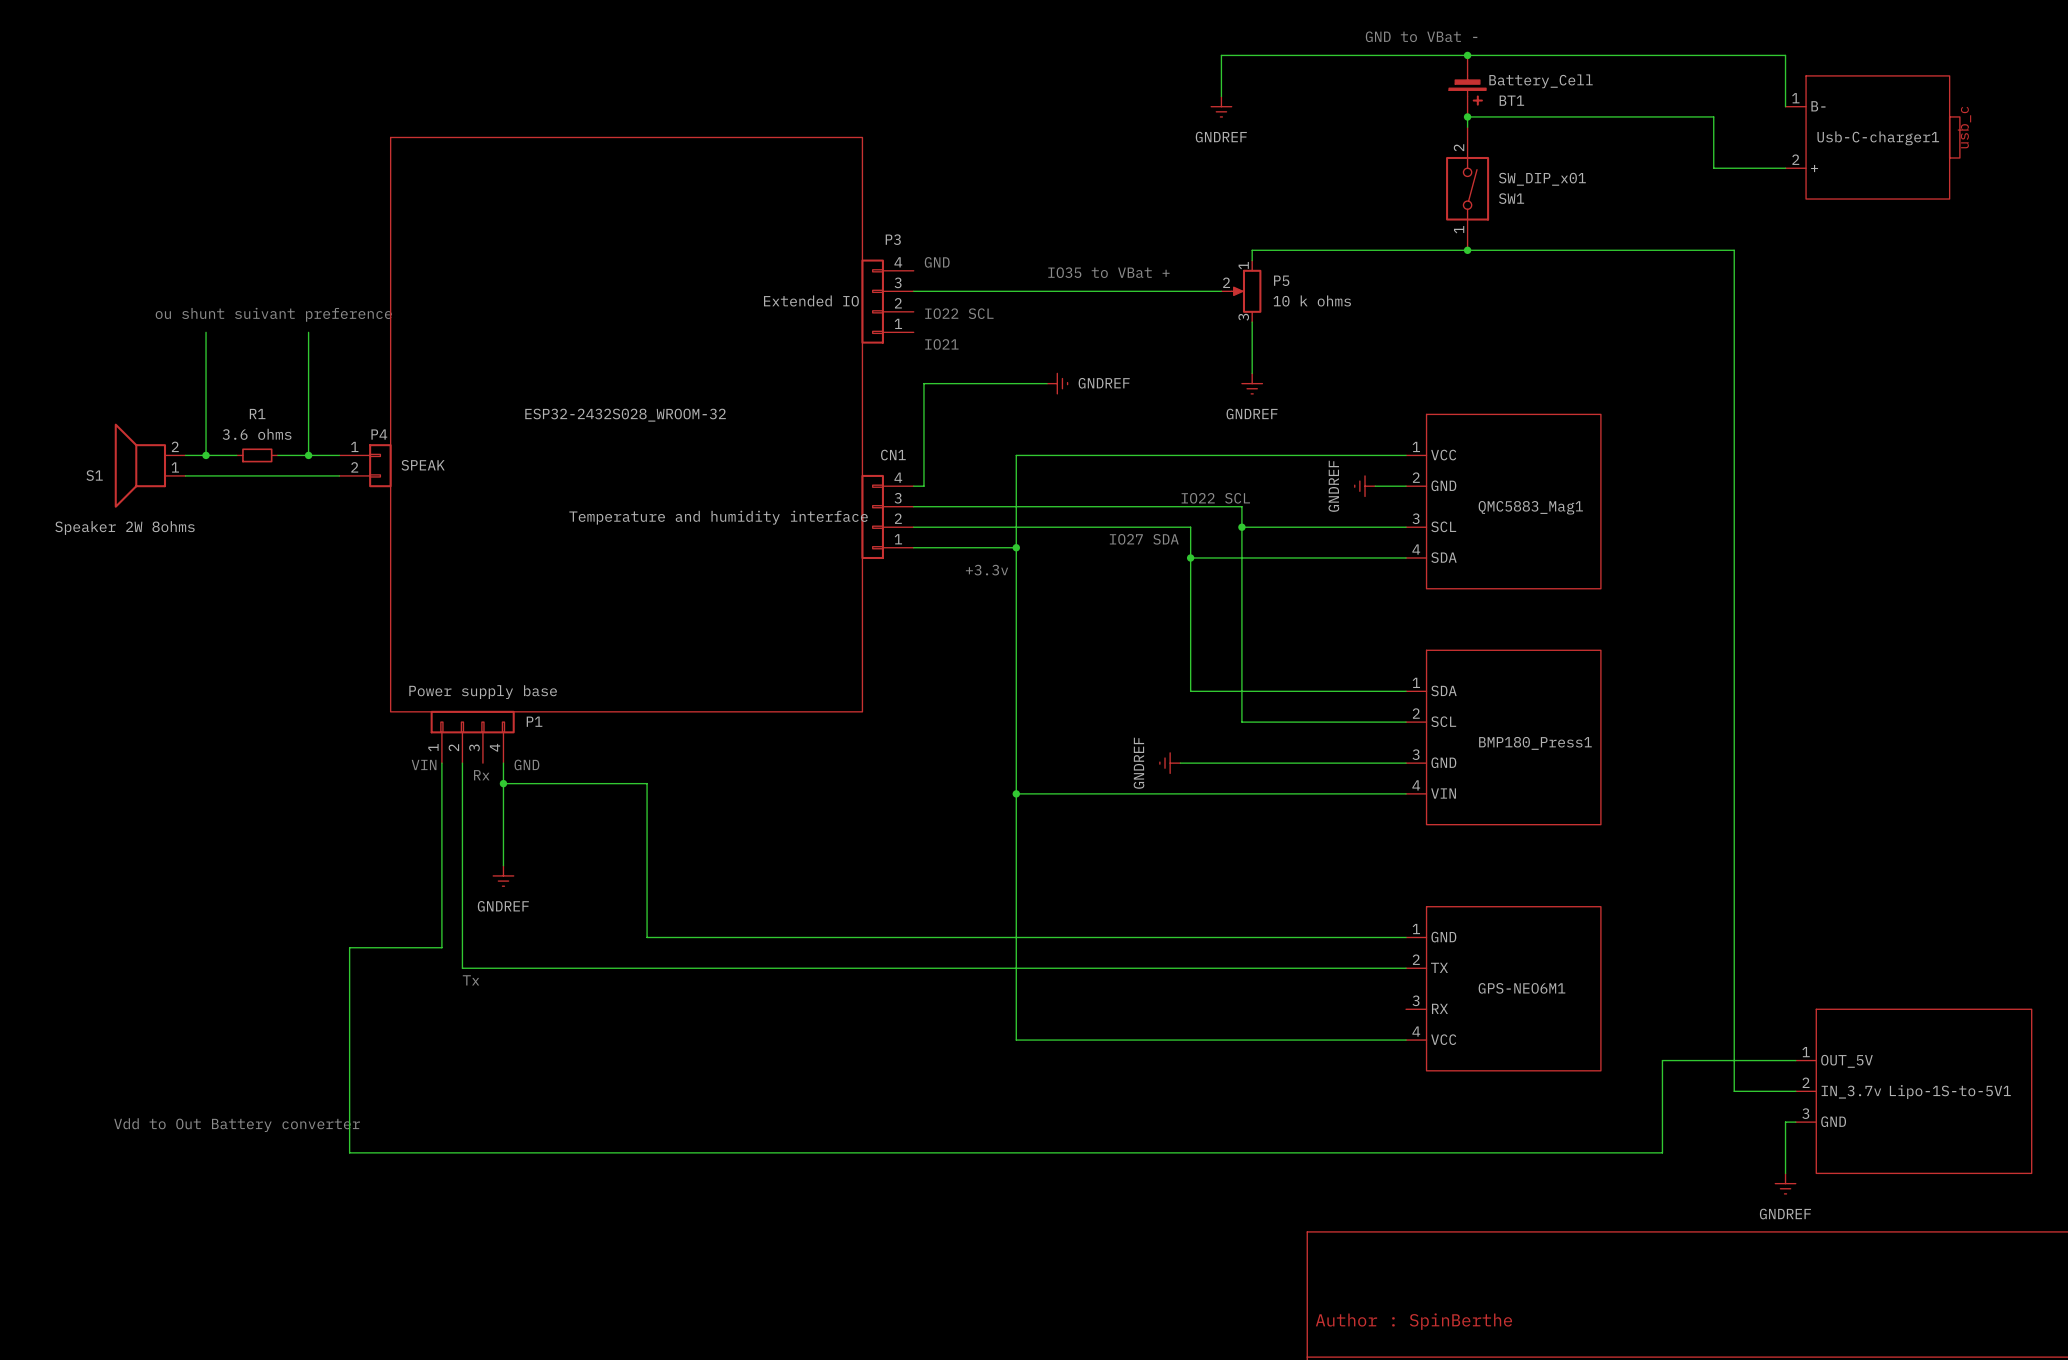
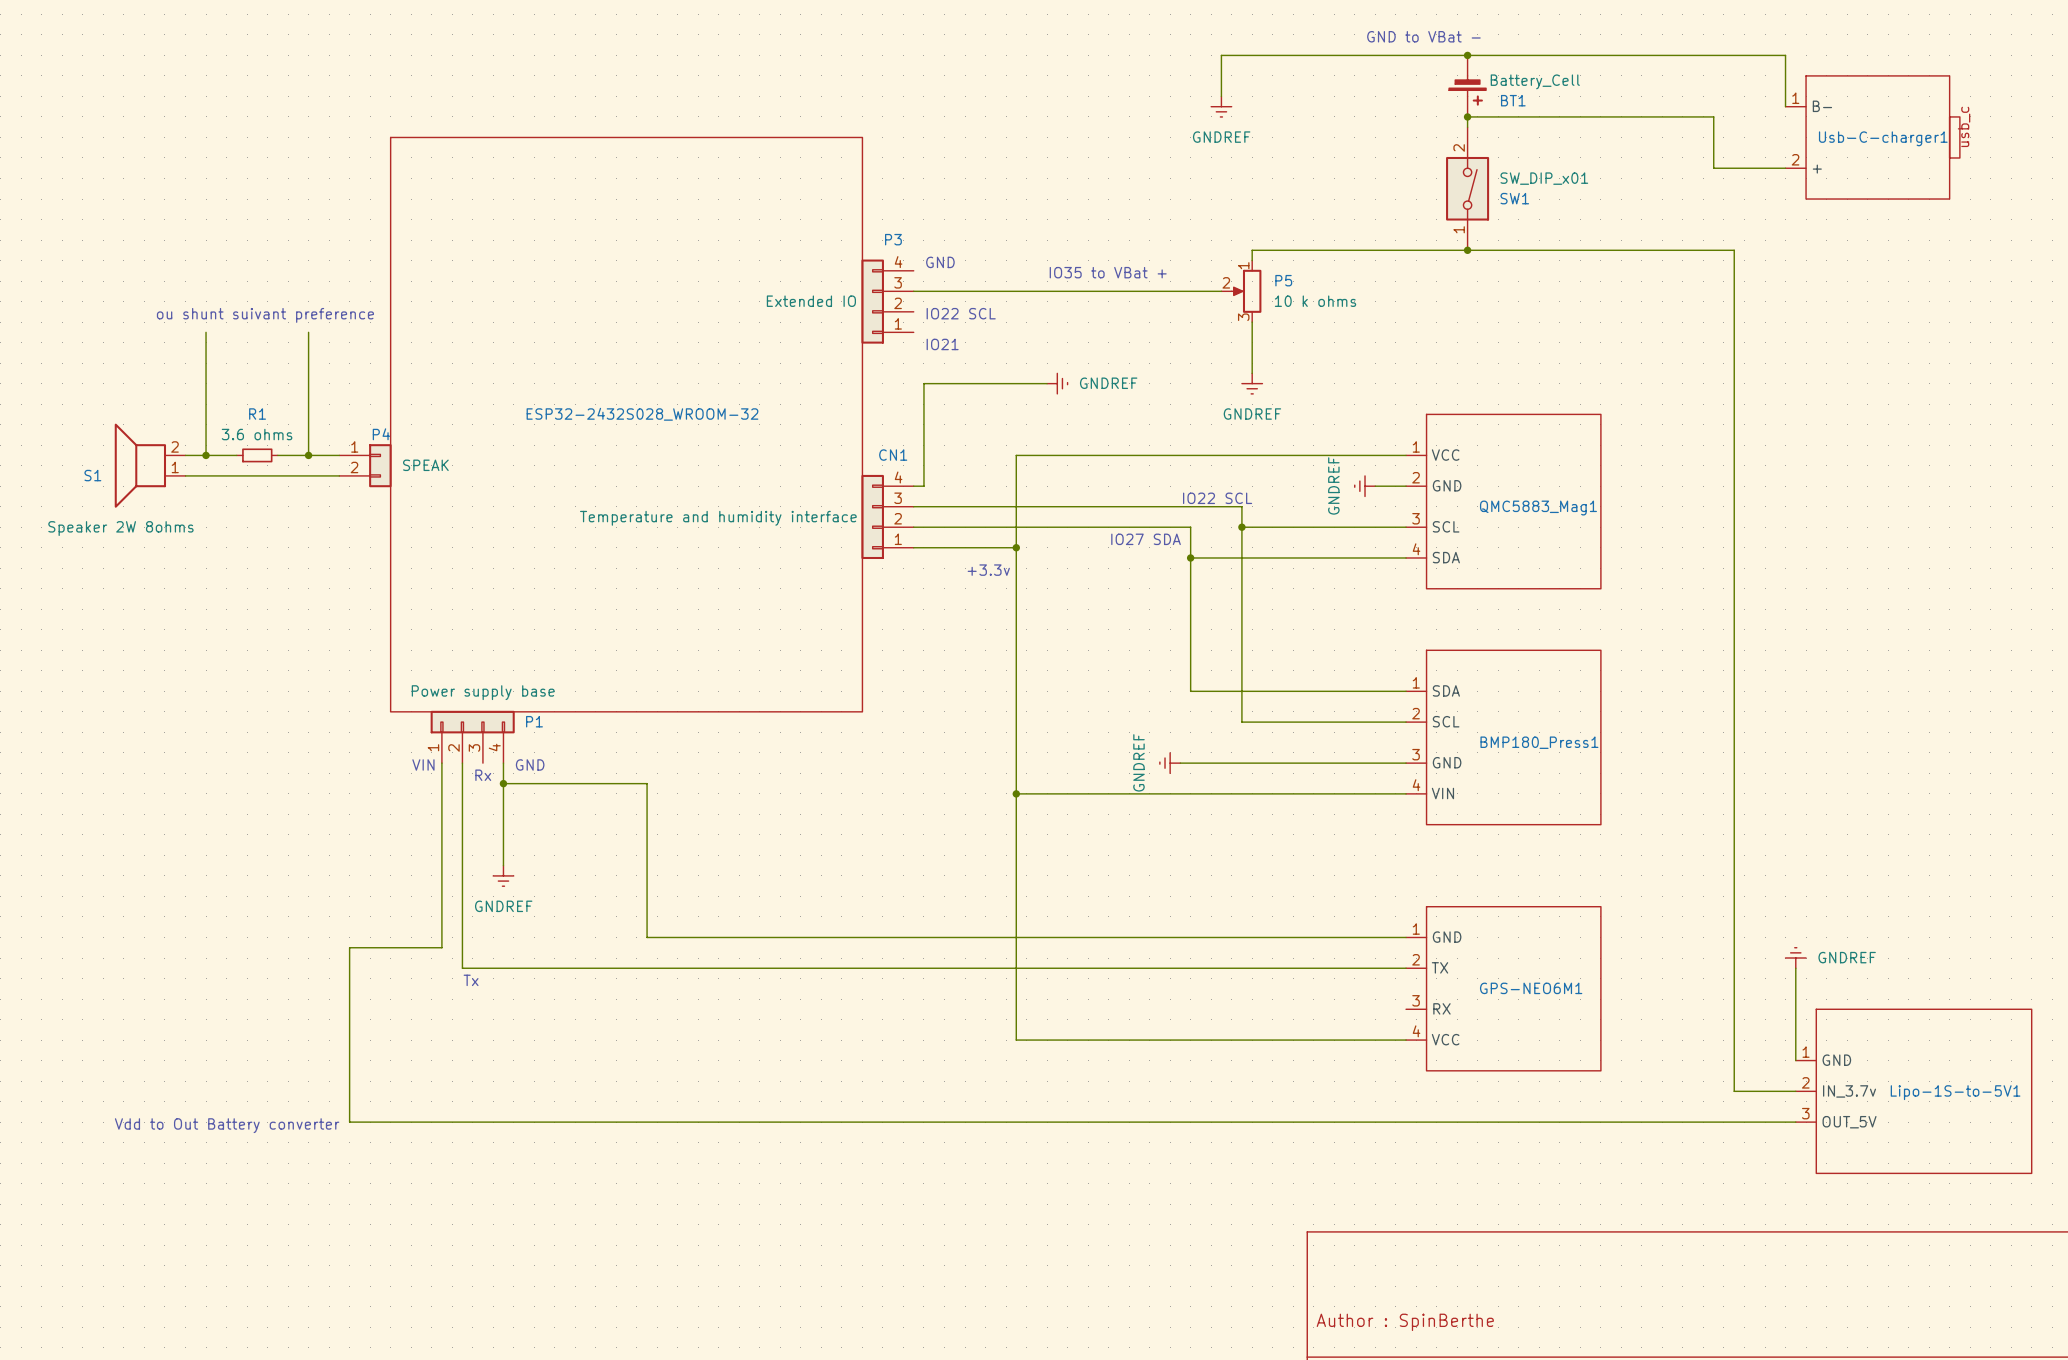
power symbol: none -> GNDREF (1795, 958)
wire: none -> (1795, 968) (1795, 1060)
wire: (1795, 1060) (1662, 1060) (1662, 1152) (349, 1152) (349, 1122) -> (1785, 1122) (349, 1122)
Lipo-1S-to-5V1 pin name: OUT_5V (1847, 1061) -> GND (1836, 1060)
Lipo-1S-to-5V1 pin name: GND (1833, 1121) -> OUT_5V (1849, 1122)
wire: (1785, 1122) (1785, 1173) -> none
power symbol: GNDREF (1785, 1183) -> none

